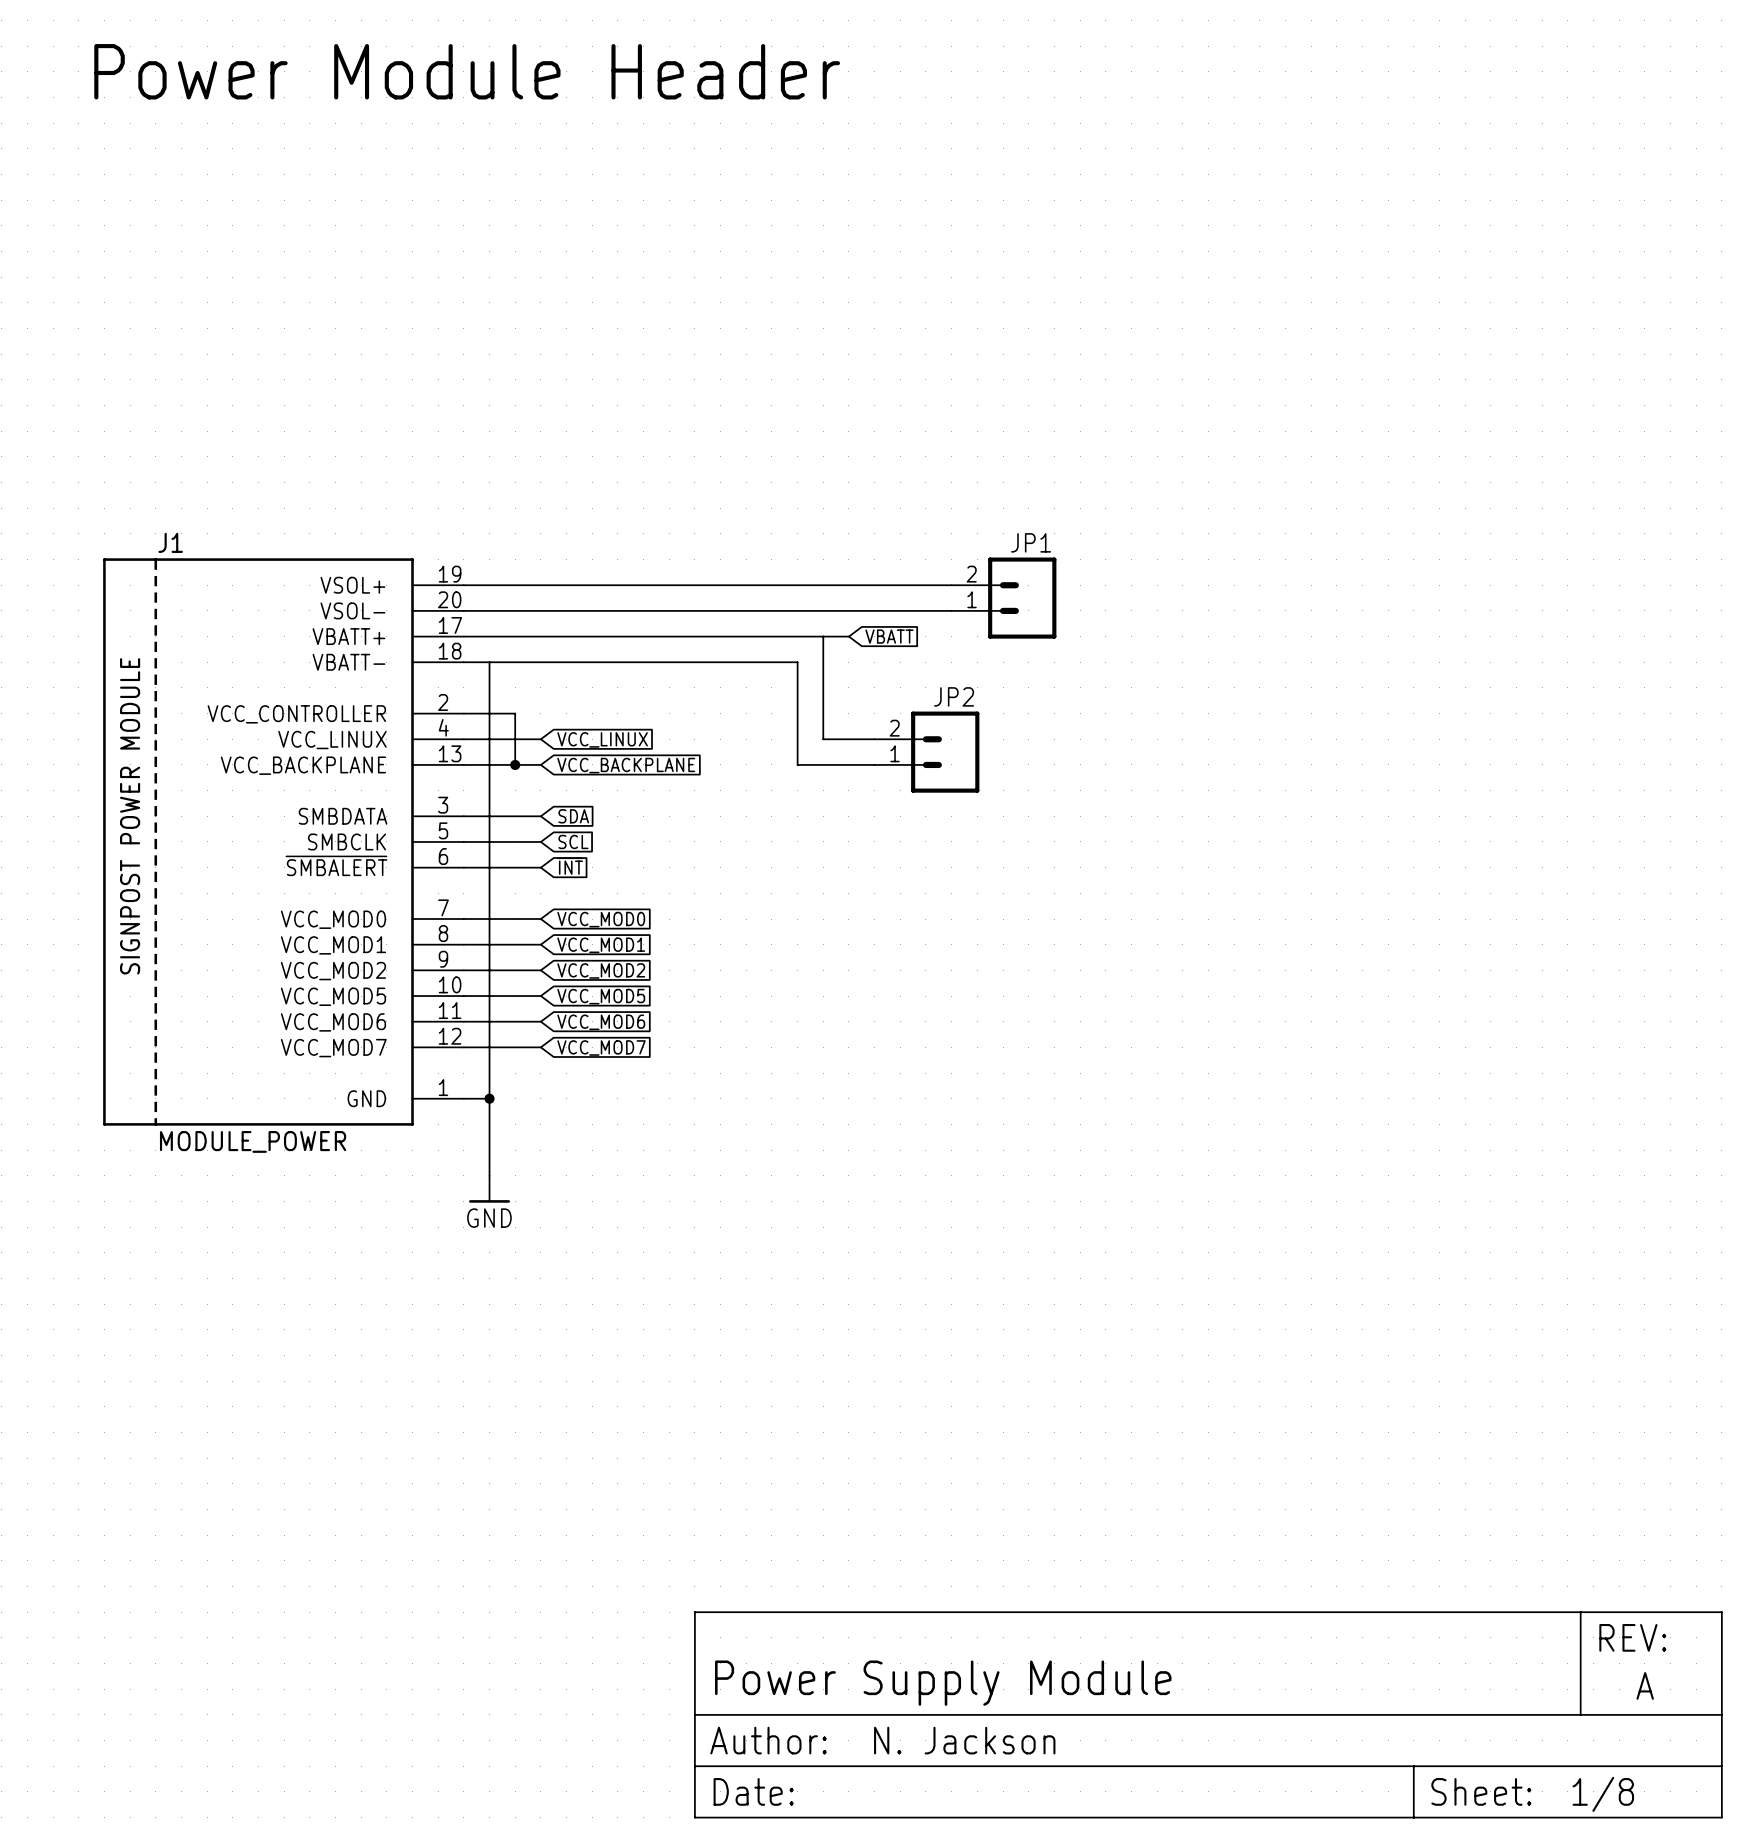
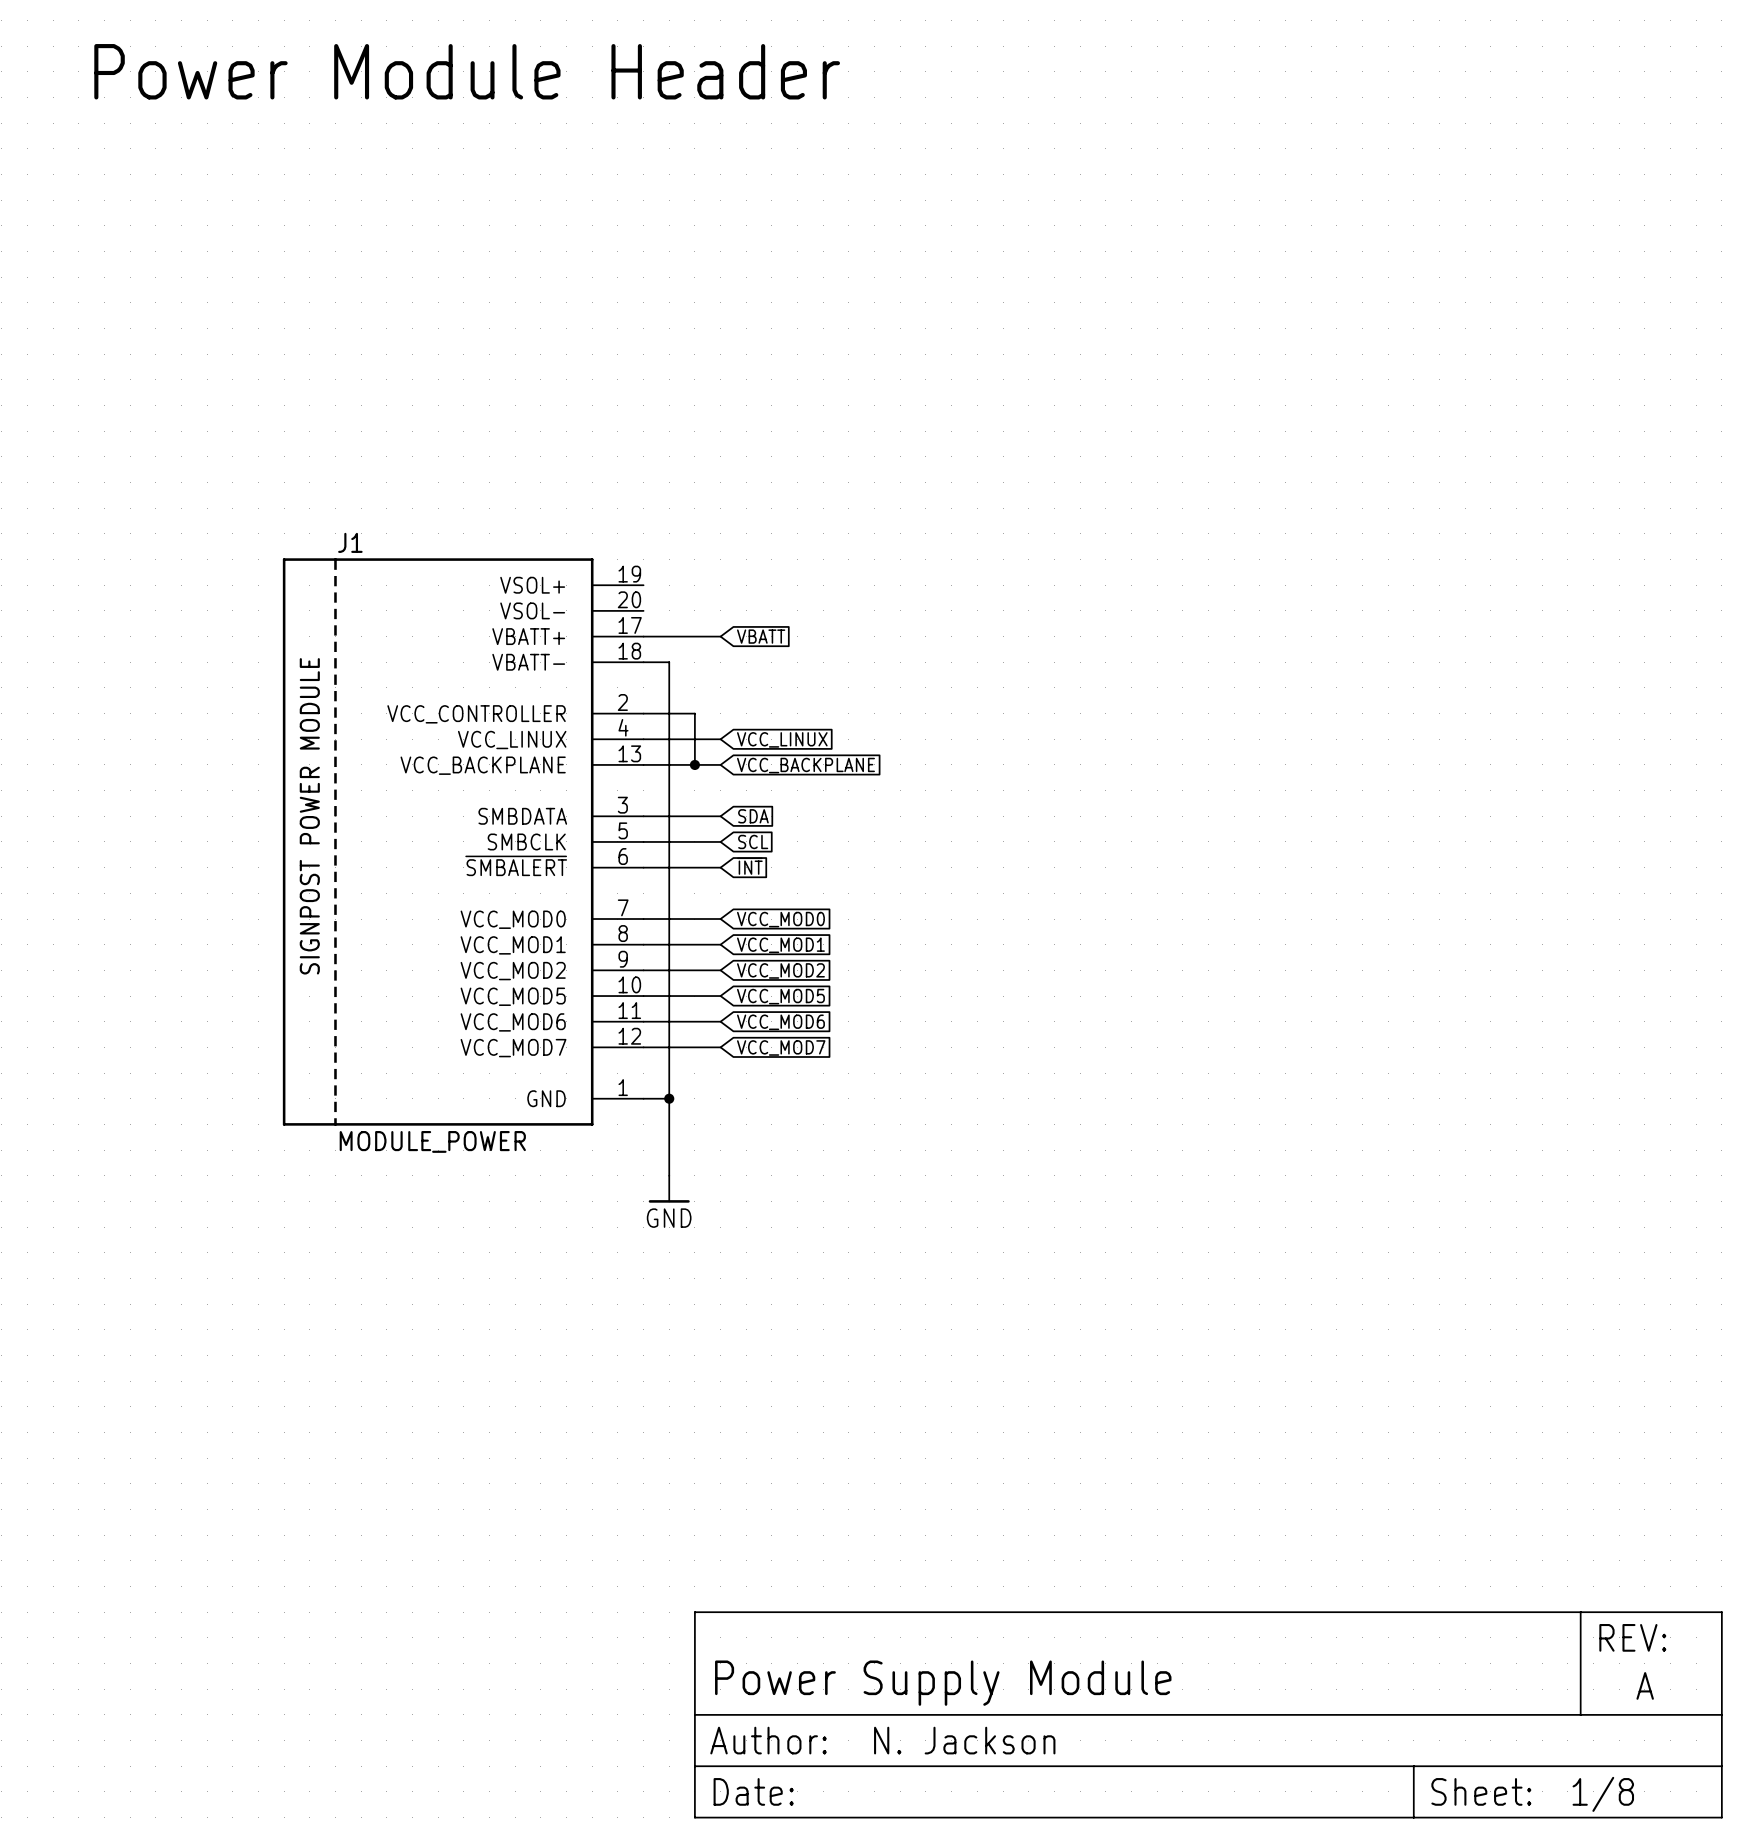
wire: (463, 585) (951, 585) -> none
JP1: (1004, 598) -> none
wire: (463, 610) (951, 610) -> none
wire: (463, 636) (643, 636) -> none
wire: (720, 636) (848, 636) -> none
wire: (823, 636) (823, 739) (874, 739) -> none
global label position: VBATT (889, 636) -> VBATT (761, 636)
wire: (463, 662) (643, 662) -> none
wire: (489, 662) (489, 1175) -> none
wire: (669, 662) (797, 662) (797, 764) (874, 764) -> (669, 662) (669, 1175)
wire: (463, 713) (515, 713) (515, 764) -> (643, 713) (694, 713) (694, 764)
wire: (463, 739) (540, 739) -> (643, 739) (720, 739)
global label position: VCC_LINUX (602, 739) -> VCC_LINUX (782, 739)
JP2: (927, 752) -> none
wire: (463, 764) (540, 764) -> (643, 764) (720, 764)
junction: (515, 764) -> none
junction: none -> (694, 764)
global label position: VCC_BACKPLANE (626, 765) -> VCC_BACKPLANE (805, 765)
wire: (463, 816) (540, 816) -> (643, 816) (720, 816)
global label position: SDA (573, 816) -> SDA (753, 816)
J1 position: (283, 841) -> (463, 841)
wire: (463, 841) (540, 841) -> (643, 841) (720, 841)
global label position: SCL (573, 841) -> SCL (753, 841)
global label position: ~{INT} (570, 866) -> ~{INT} (749, 866)
wire: (463, 867) (540, 867) -> (643, 867) (720, 867)
wire: (463, 919) (540, 919) -> (643, 919) (720, 919)
global label position: VCC_MOD0 (601, 919) -> VCC_MOD0 (780, 919)
wire: (463, 944) (540, 944) -> (643, 944) (720, 944)
global label position: VCC_MOD1 (601, 945) -> VCC_MOD1 (780, 945)
wire: (463, 970) (540, 970) -> (643, 970) (720, 970)
global label position: VCC_MOD2 (601, 970) -> VCC_MOD2 (780, 970)
wire: (463, 996) (540, 996) -> (643, 996) (720, 996)
global label position: VCC_MOD5 (601, 996) -> VCC_MOD5 (780, 996)
wire: (463, 1021) (540, 1021) -> (643, 1021) (720, 1021)
global label position: VCC_MOD6 (601, 1022) -> VCC_MOD6 (780, 1022)
wire: (463, 1047) (540, 1047) -> (643, 1047) (720, 1047)
global label position: VCC_MOD7 (601, 1047) -> VCC_MOD7 (781, 1047)
wire: (463, 1098) (489, 1098) -> (643, 1098) (669, 1098)
junction: (489, 1098) -> none
junction: none -> (669, 1098)
power symbol position: GND (489, 1189) -> GND (669, 1189)

